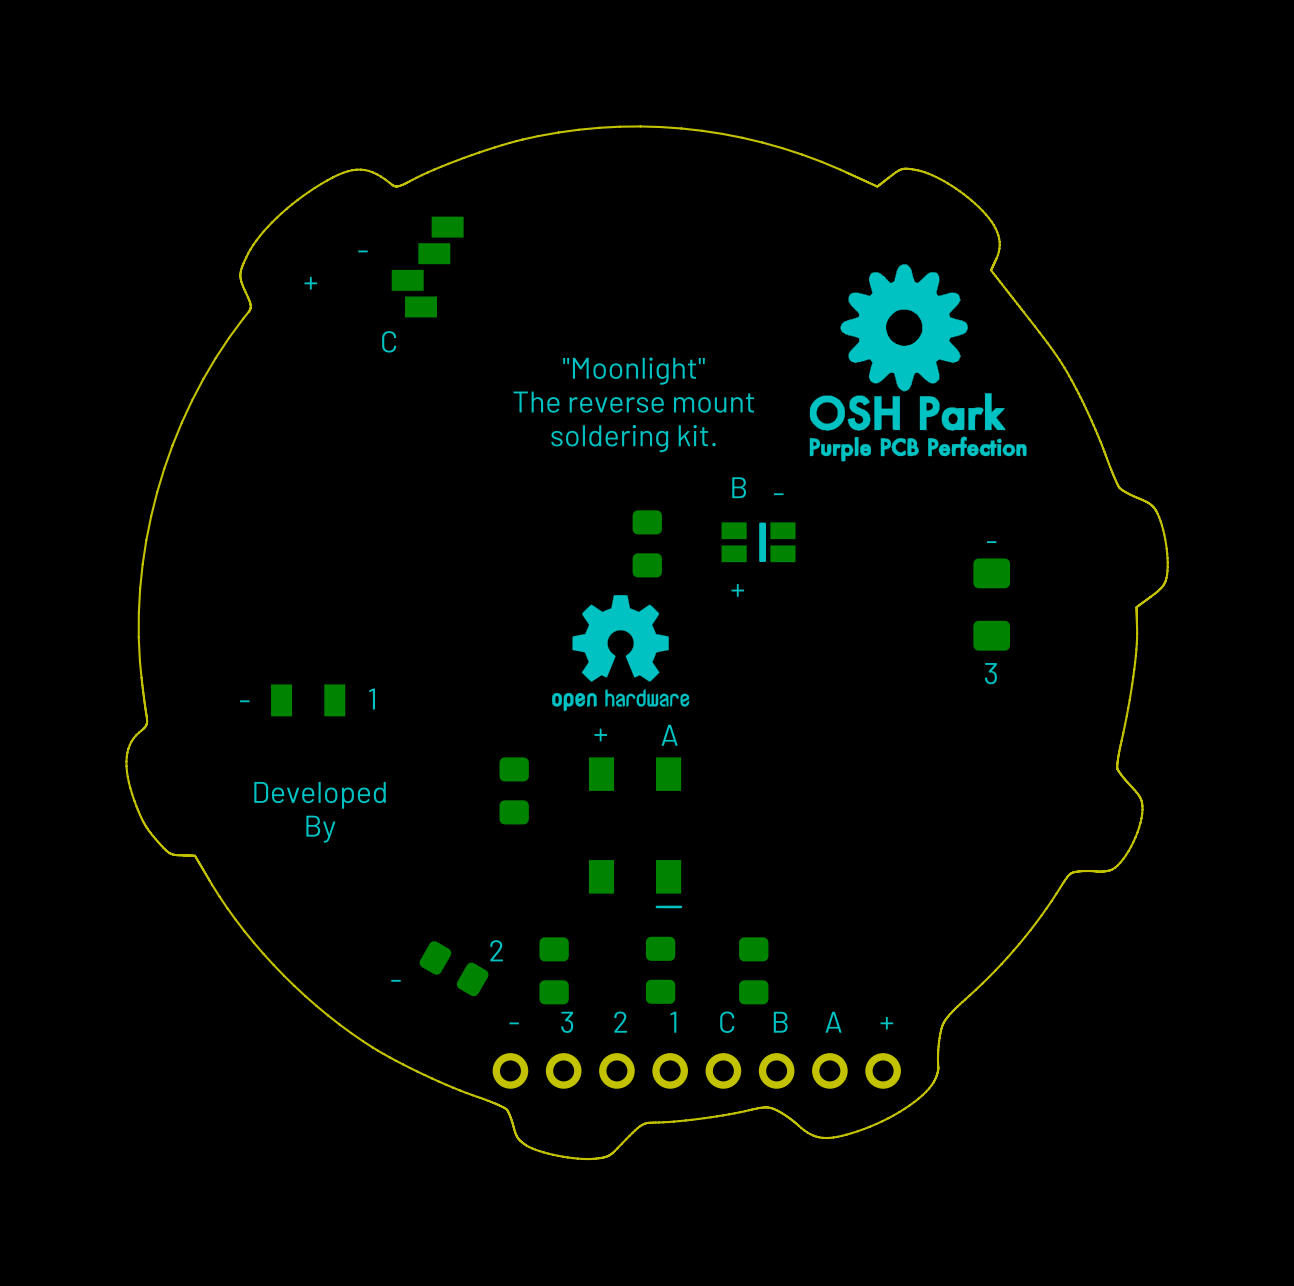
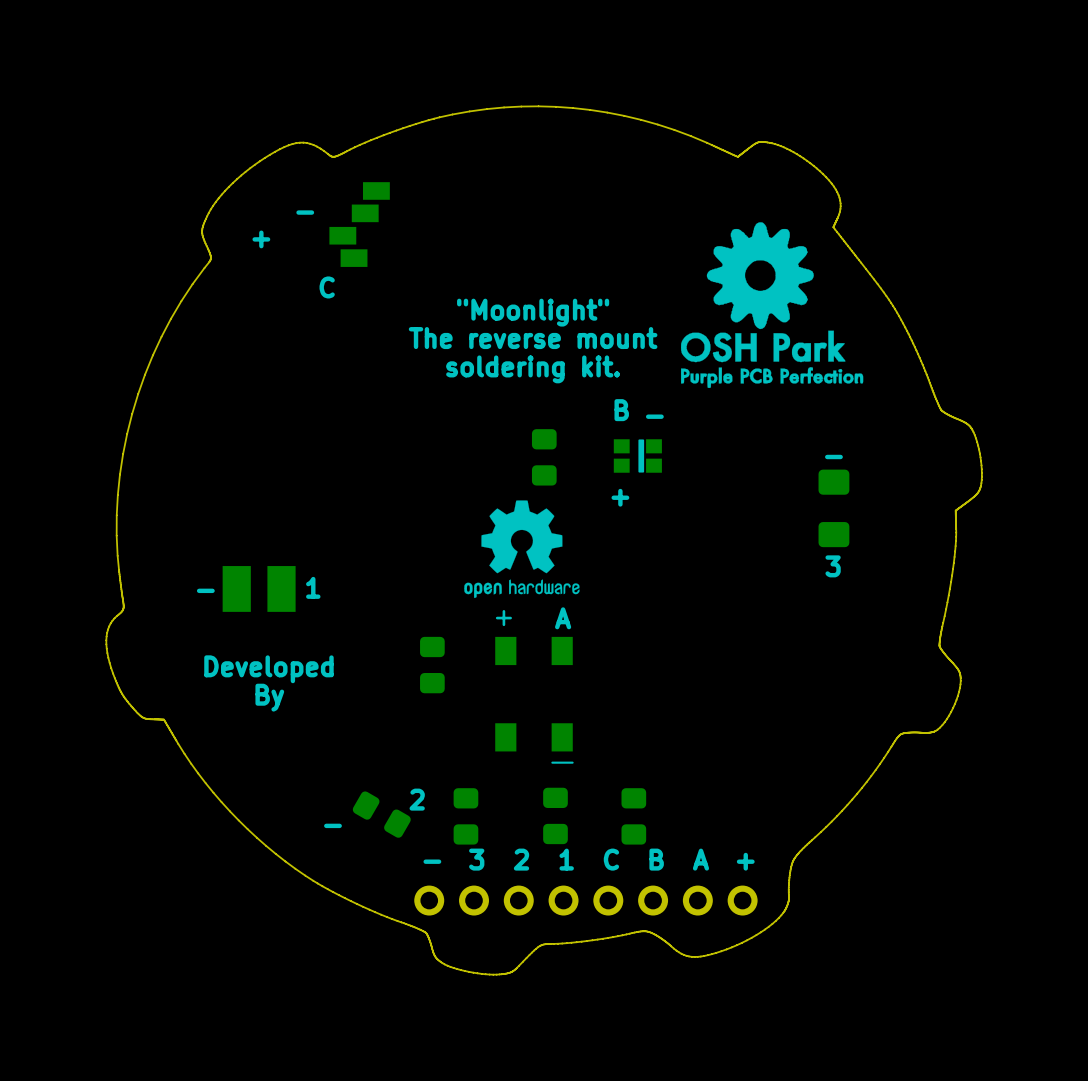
part footprint: [721, 522, 796, 563] -> [613, 439, 662, 473]
part footprint: [271, 684, 346, 717] -> [222, 566, 296, 612]

